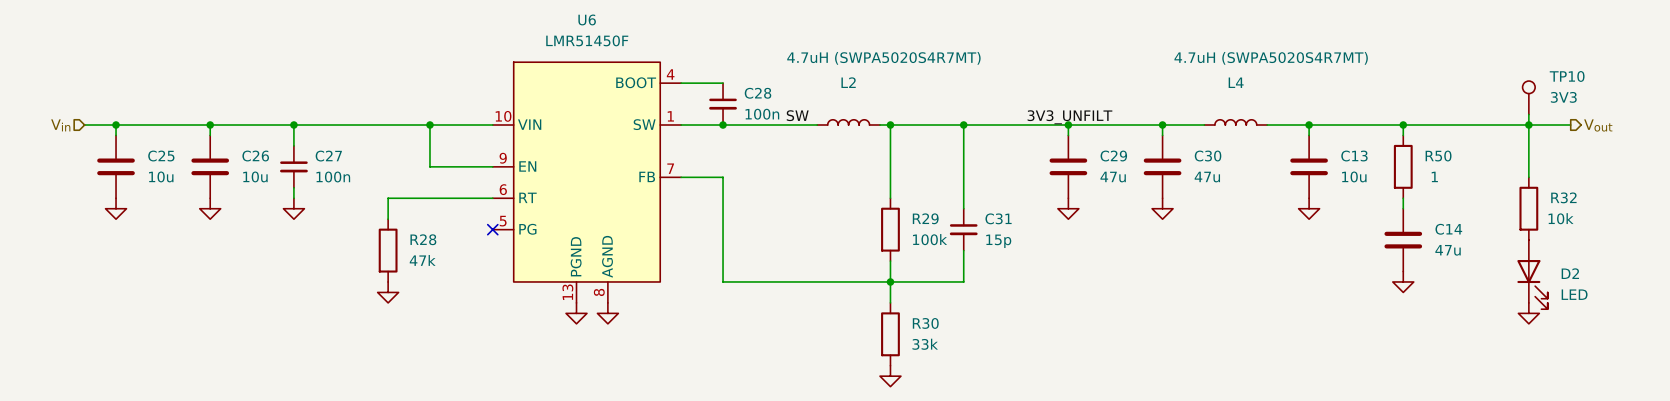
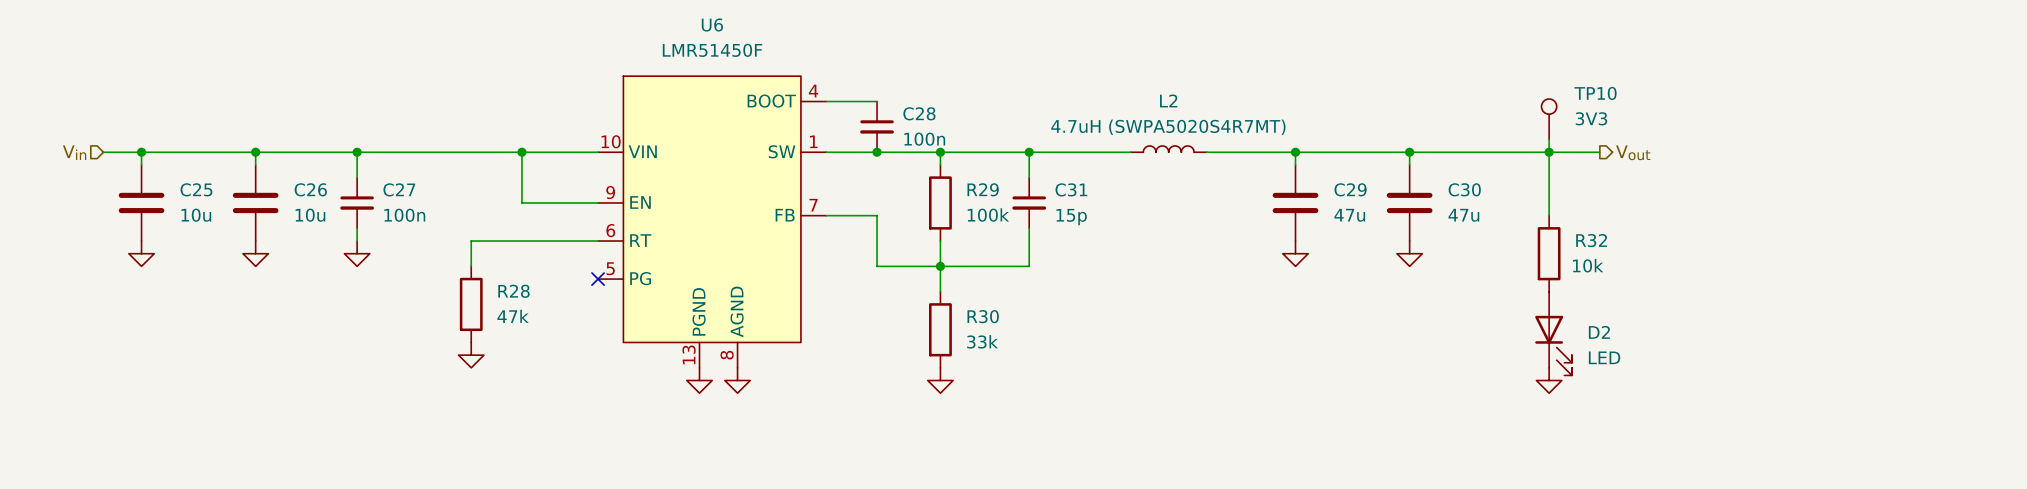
L2 value position: 4.7uH (SWPA5020S4R7MT) (883, 58) -> 4.7uH (SWPA5020S4R7MT) (1168, 127)
TP10 position: (1528, 97) -> (1549, 119)
wire: none -> (1549, 139) (1549, 215)
wire: (1528, 114) (1528, 177) -> none
label: SW (797, 115) -> none
label: 3V3_UNFILT (1069, 117) -> none
L2 position: (848, 122) -> (1168, 149)
L4: 4.7uH (SWPA5020S4R7MT) (1235, 122) -> none
wire: none -> (940, 152) (940, 164)
junction: none -> (940, 152)
wire: none -> (1029, 152) (1029, 177)
wire: (890, 125) (890, 198) -> none
junction position: (890, 125) -> (1029, 152)
wire: (932, 125) (995, 125) -> (991, 152) (1067, 152)
wire: (963, 125) (963, 208) -> none
junction: (963, 125) -> none
wire: none -> (1460, 152) (1536, 152)
wire: (1309, 125) (1309, 135) -> none
junction position: (1309, 125) -> (1549, 152)
wire: (1319, 125) (1570, 125) -> none
hierarchical label: none -> Vout (1633, 152)
wire: (1403, 125) (1403, 135) -> none
junction: (1403, 125) -> none
junction: (1528, 125) -> none
hierarchical label: Vout (1598, 125) -> none
C13: 10u (1309, 166) -> none
R50: 1 (1403, 166) -> none
wire: (1403, 198) (1403, 208) -> none
power symbol: (1309, 208) -> none
R32 position: (1528, 208) -> (1549, 253)
wire: (723, 219) (723, 281) (963, 281) (963, 250) -> (877, 266) (1029, 266) (1029, 228)
junction: none -> (940, 266)
R29 position: (890, 229) -> (940, 202)
C31 position: (963, 229) -> (1029, 202)
C14: 47u (1403, 240) -> none
wire: (890, 261) (890, 302) -> (940, 241) (940, 291)
D2 position: (1532, 274) -> (1553, 333)
junction: (890, 281) -> none
power symbol: (1403, 281) -> none
power symbol: none -> (1549, 380)
power symbol: (1528, 313) -> none
R30 position: (890, 334) -> (940, 329)
power symbol position: (890, 376) -> (940, 380)

